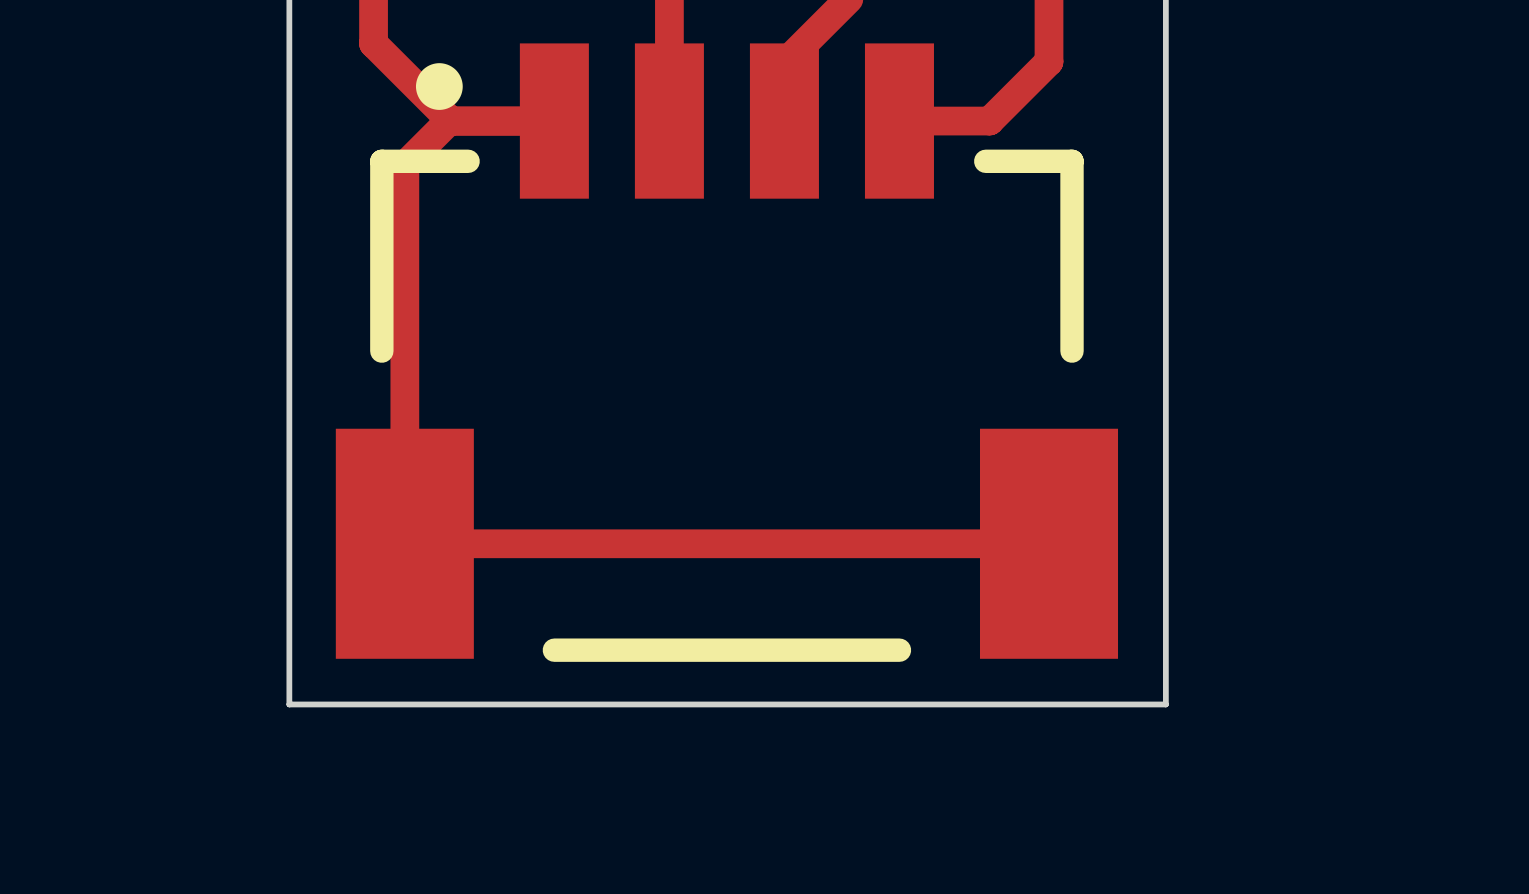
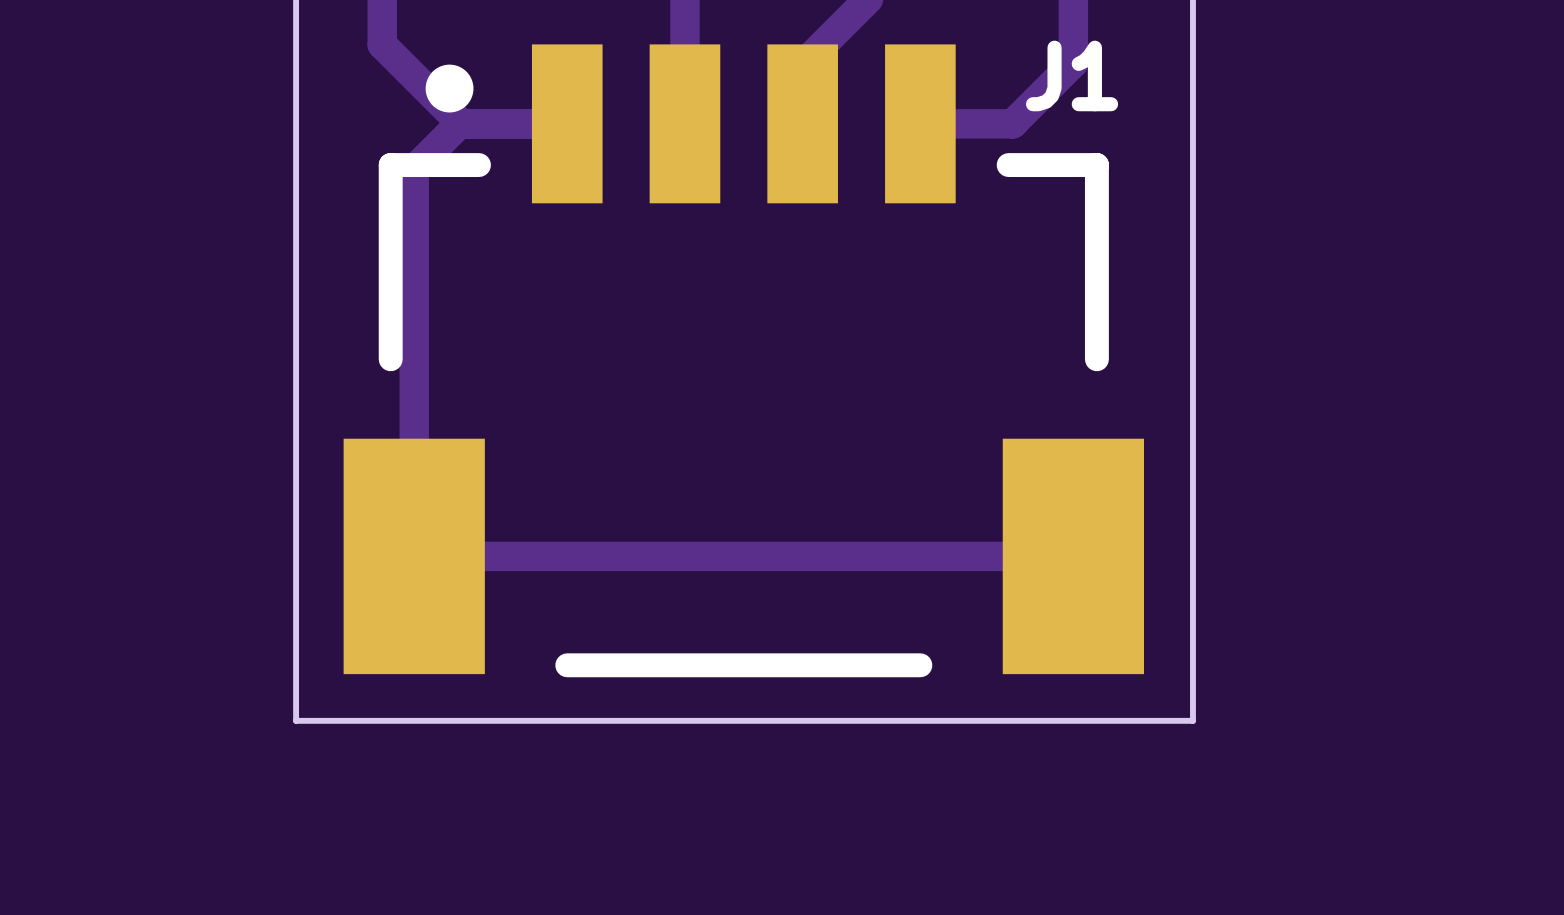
J1 name: none -> J1 (1072, 75)

